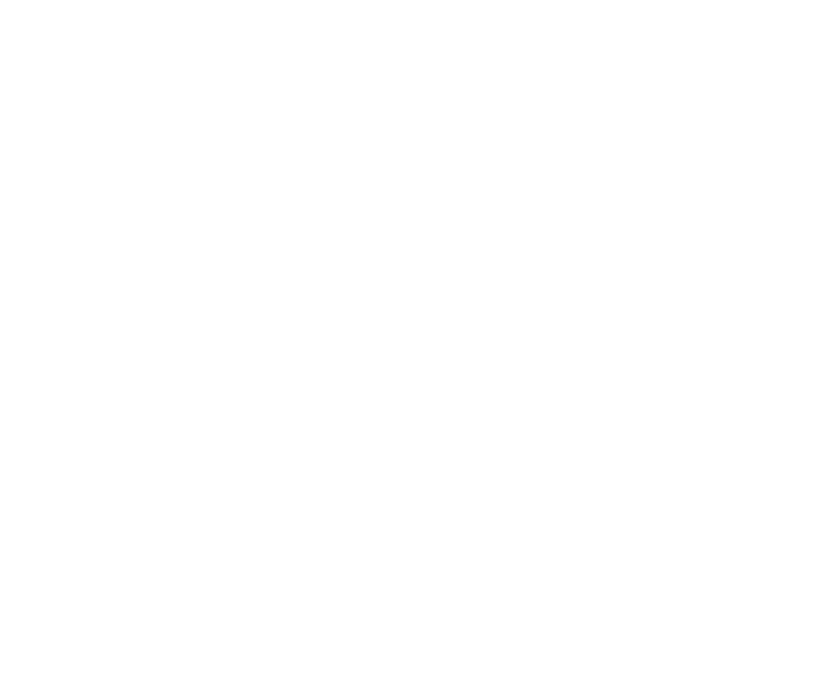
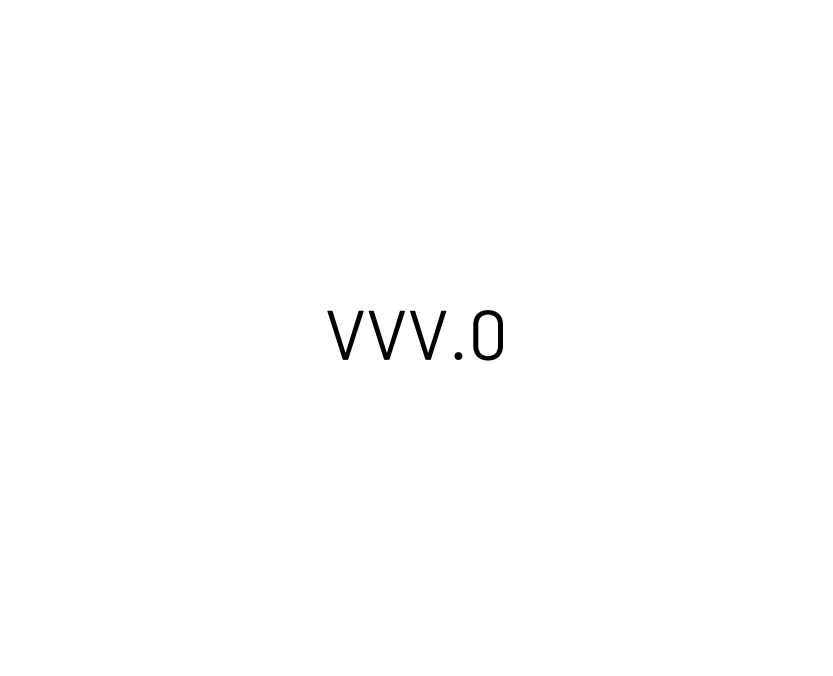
text: none -> VVV.0 (415, 335)

